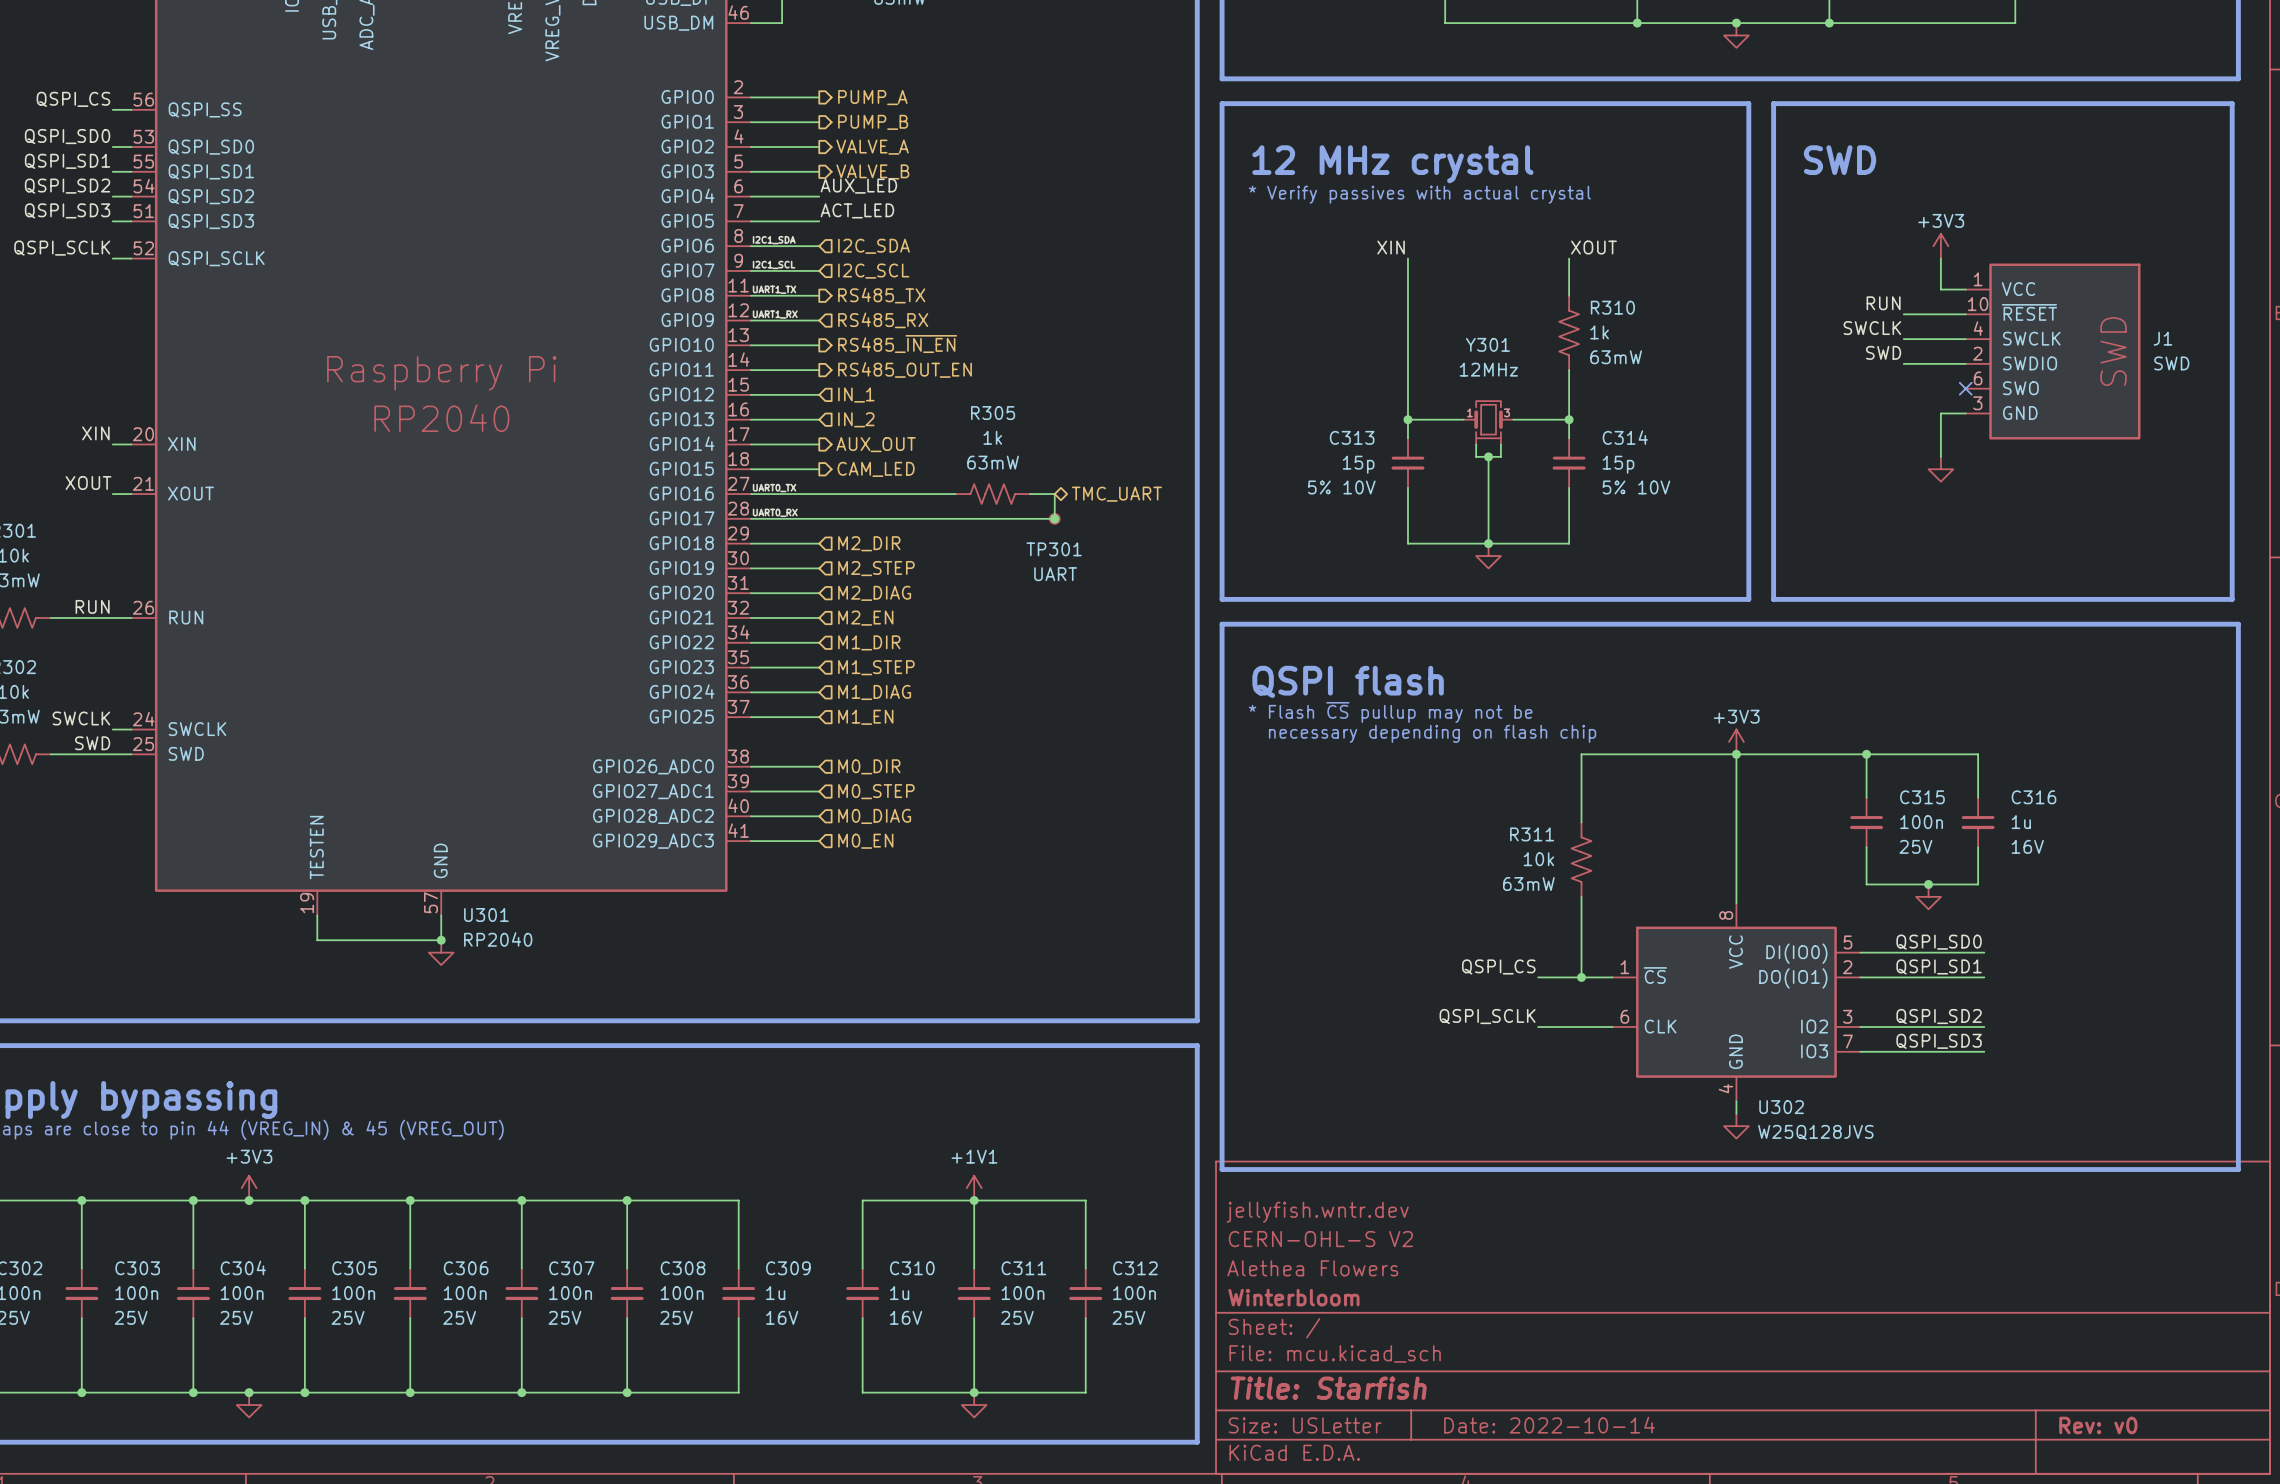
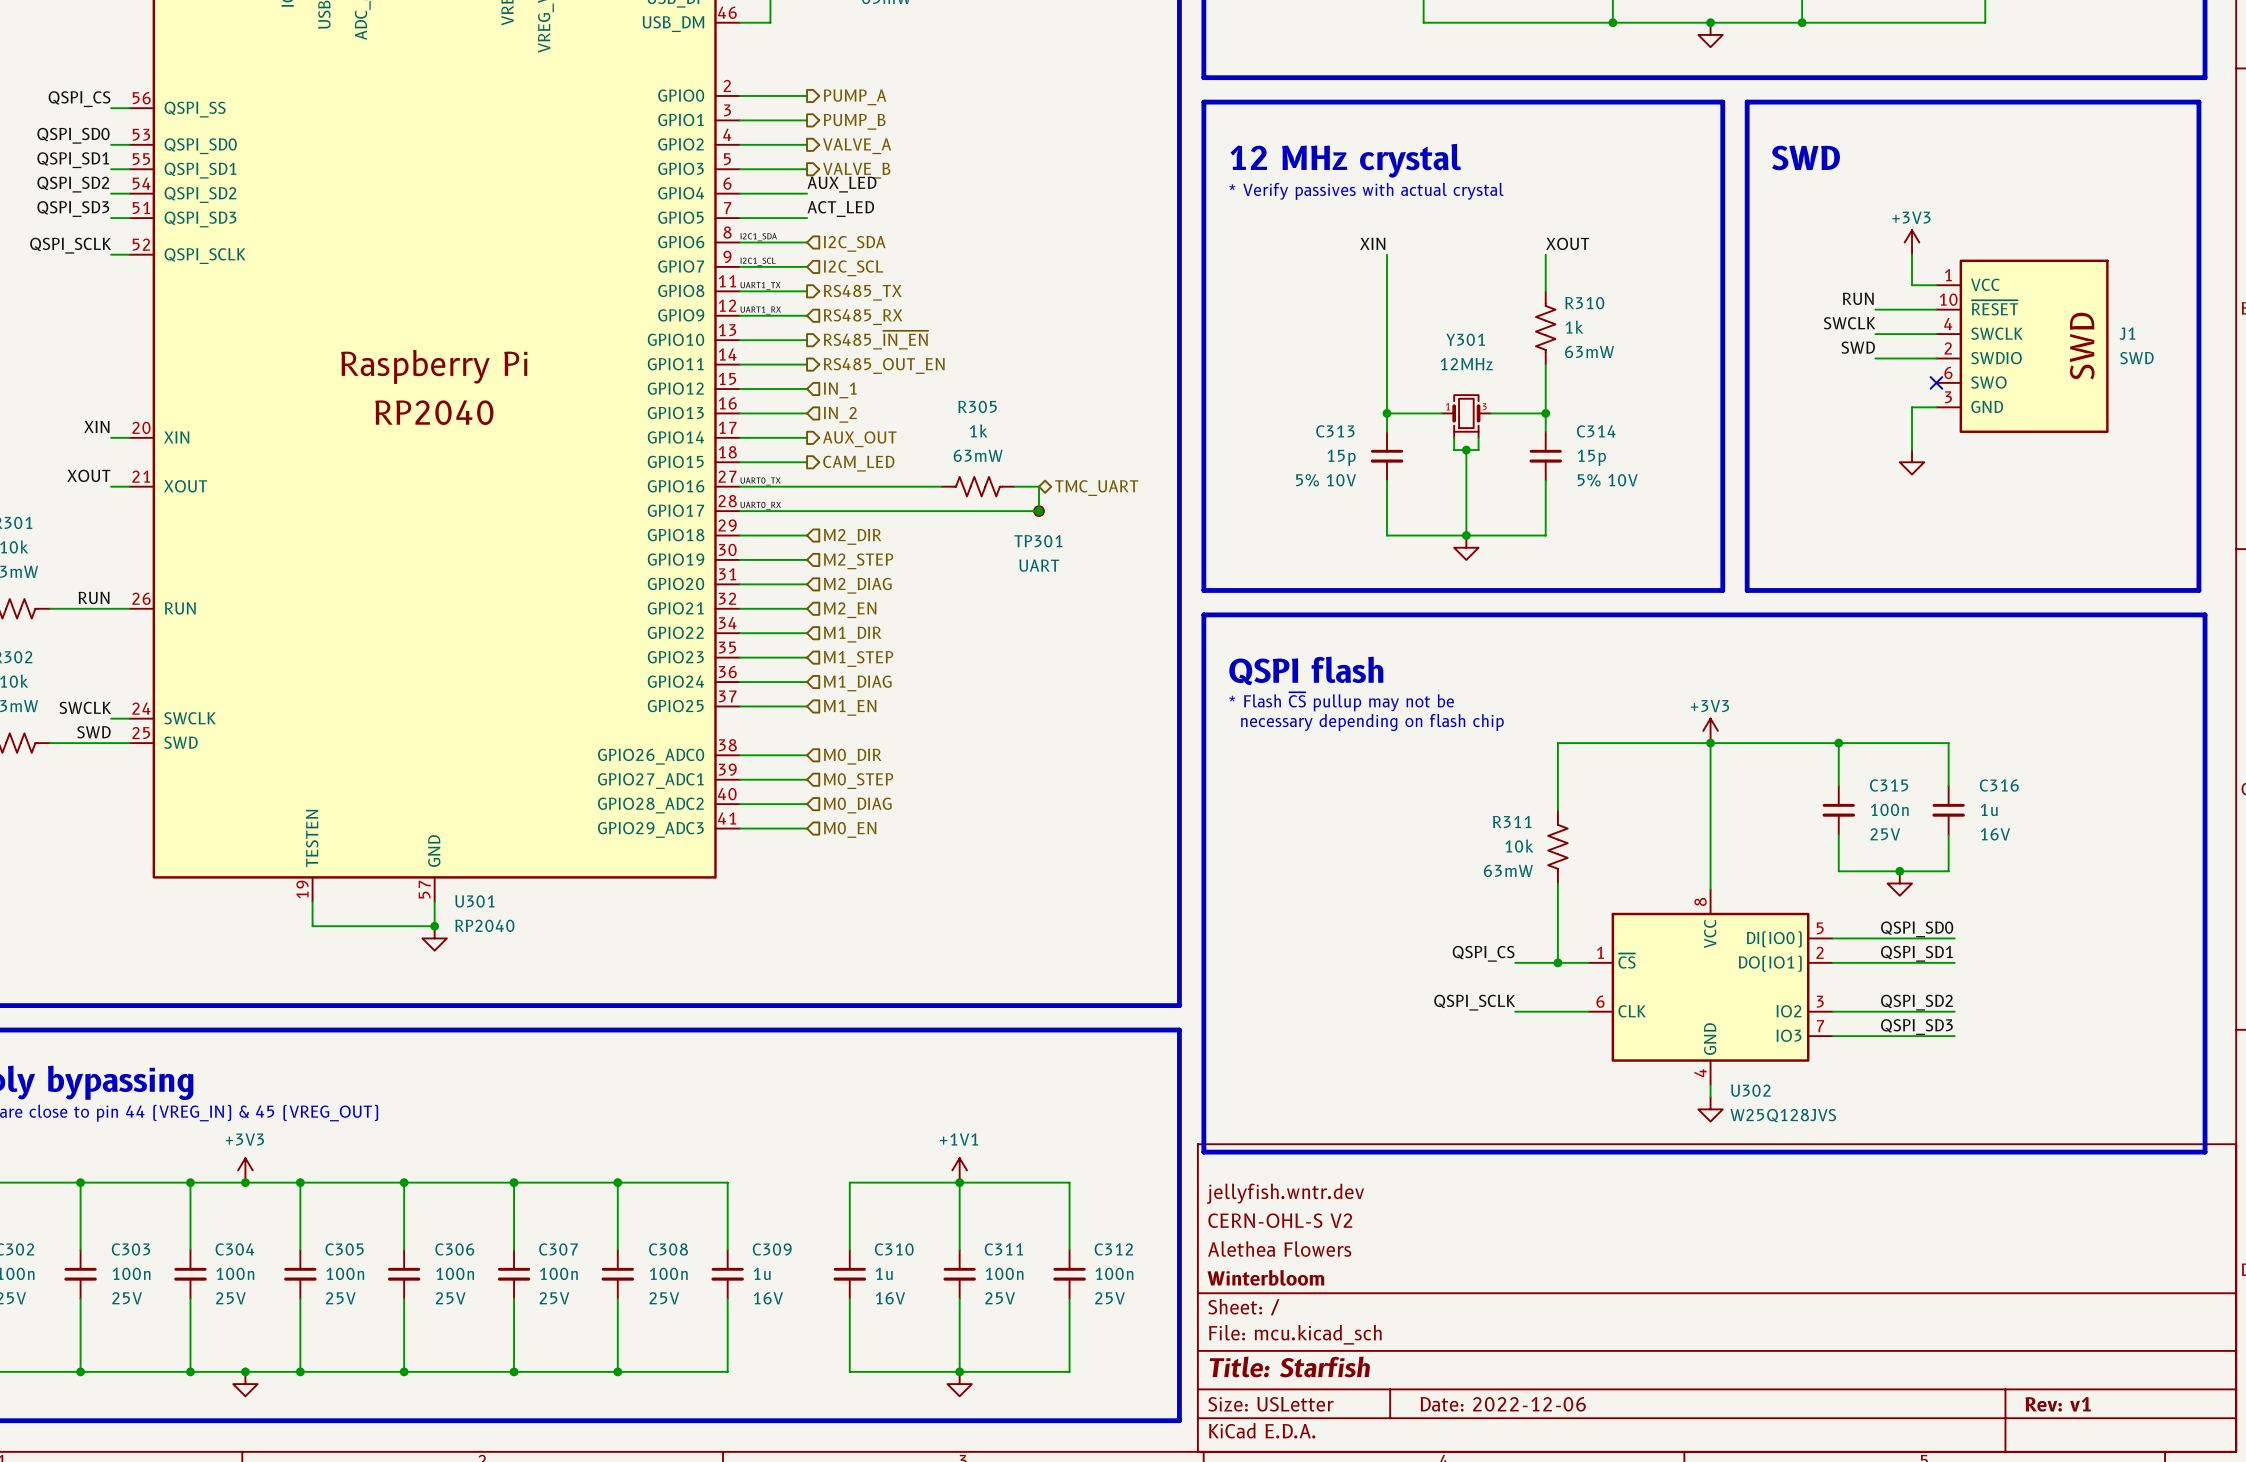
title block: Date: 2022-10-14 (1549, 1425) -> Date: 2022-12-06 (1503, 1404)
title block: Rev: v0 (2098, 1425) -> Rev: v1 (2058, 1404)

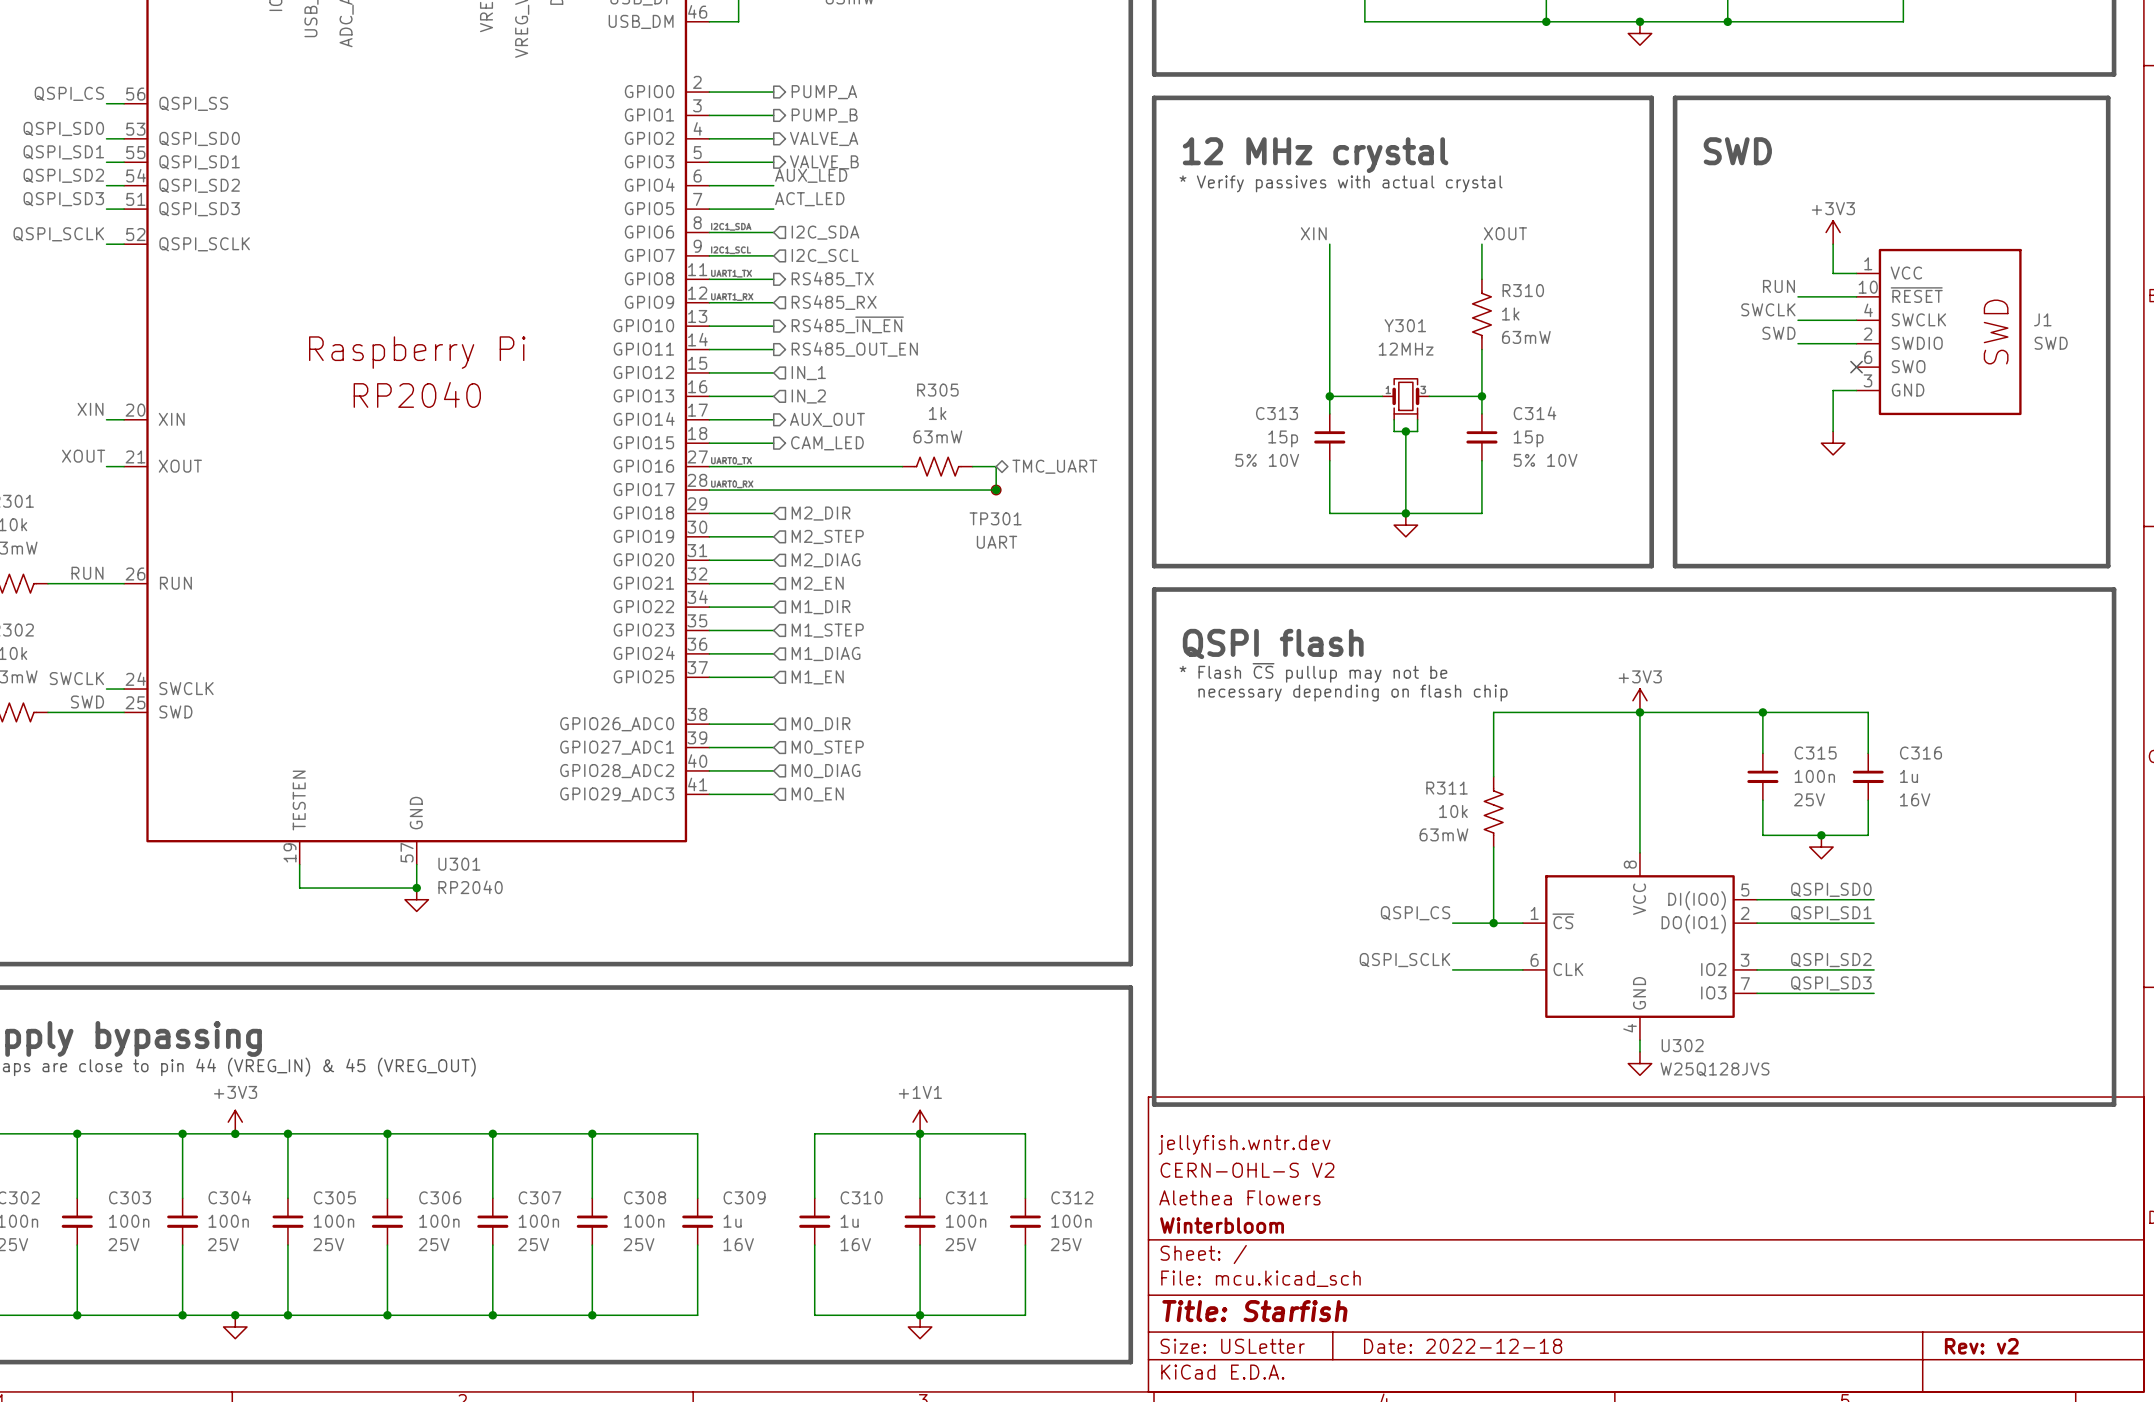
title block: Date: 2022-12-06 (1503, 1404) -> Date: 2022-12-18 (1463, 1346)
title block: Rev: v1 (2058, 1404) -> Rev: v2 (1981, 1346)

